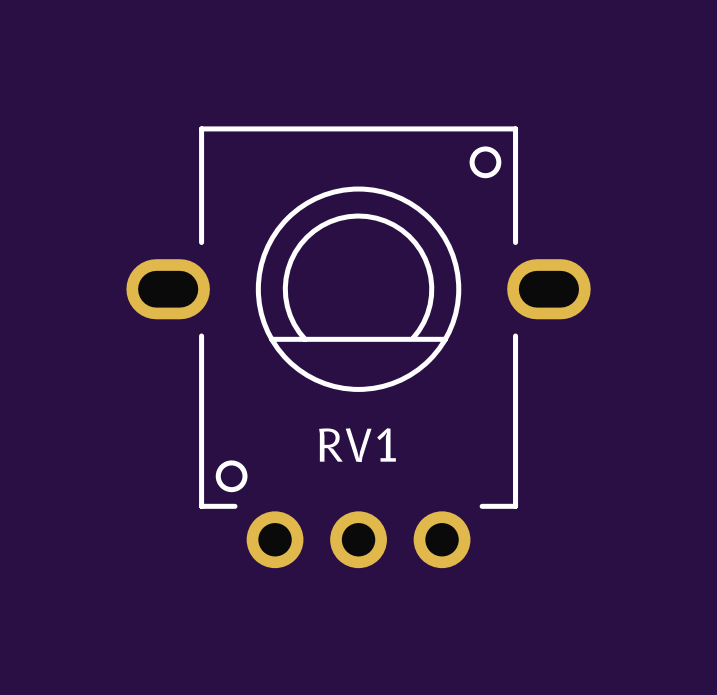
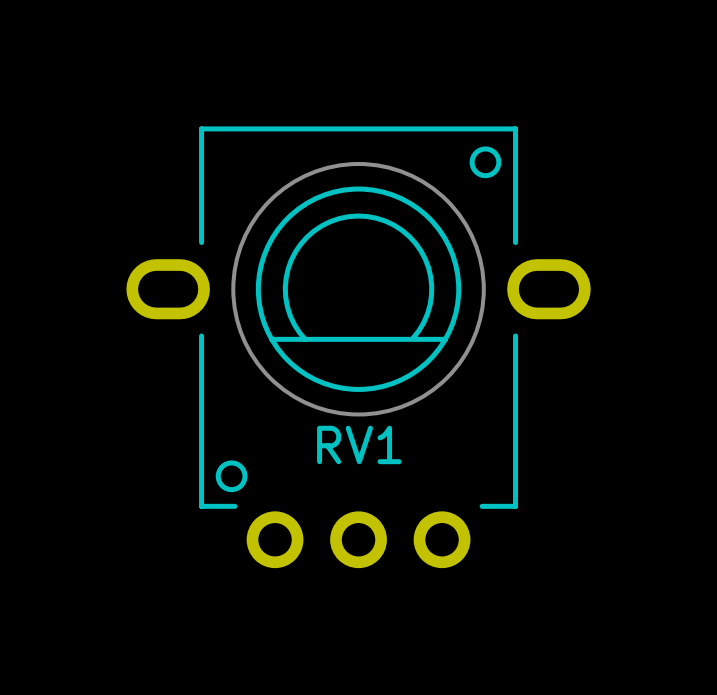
drawing: none -> [231, 161, 486, 417]

